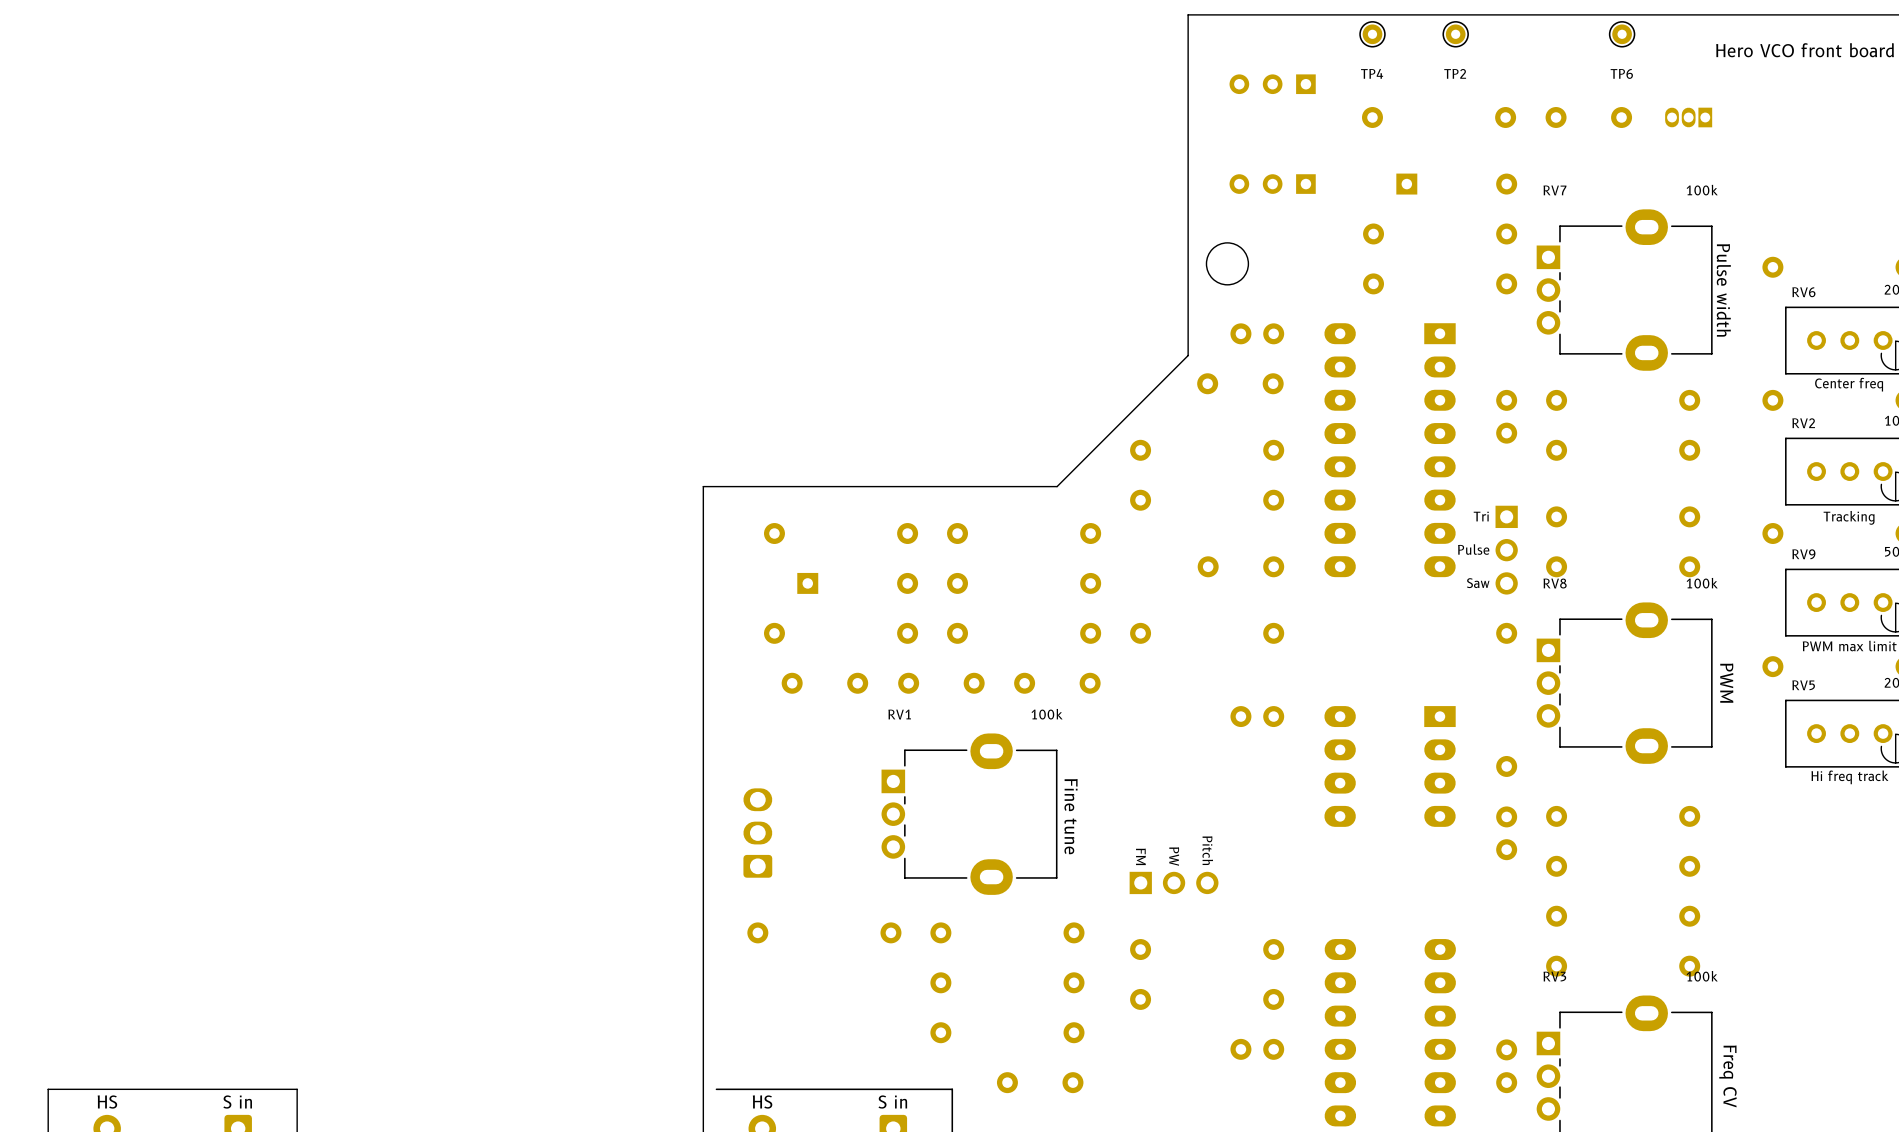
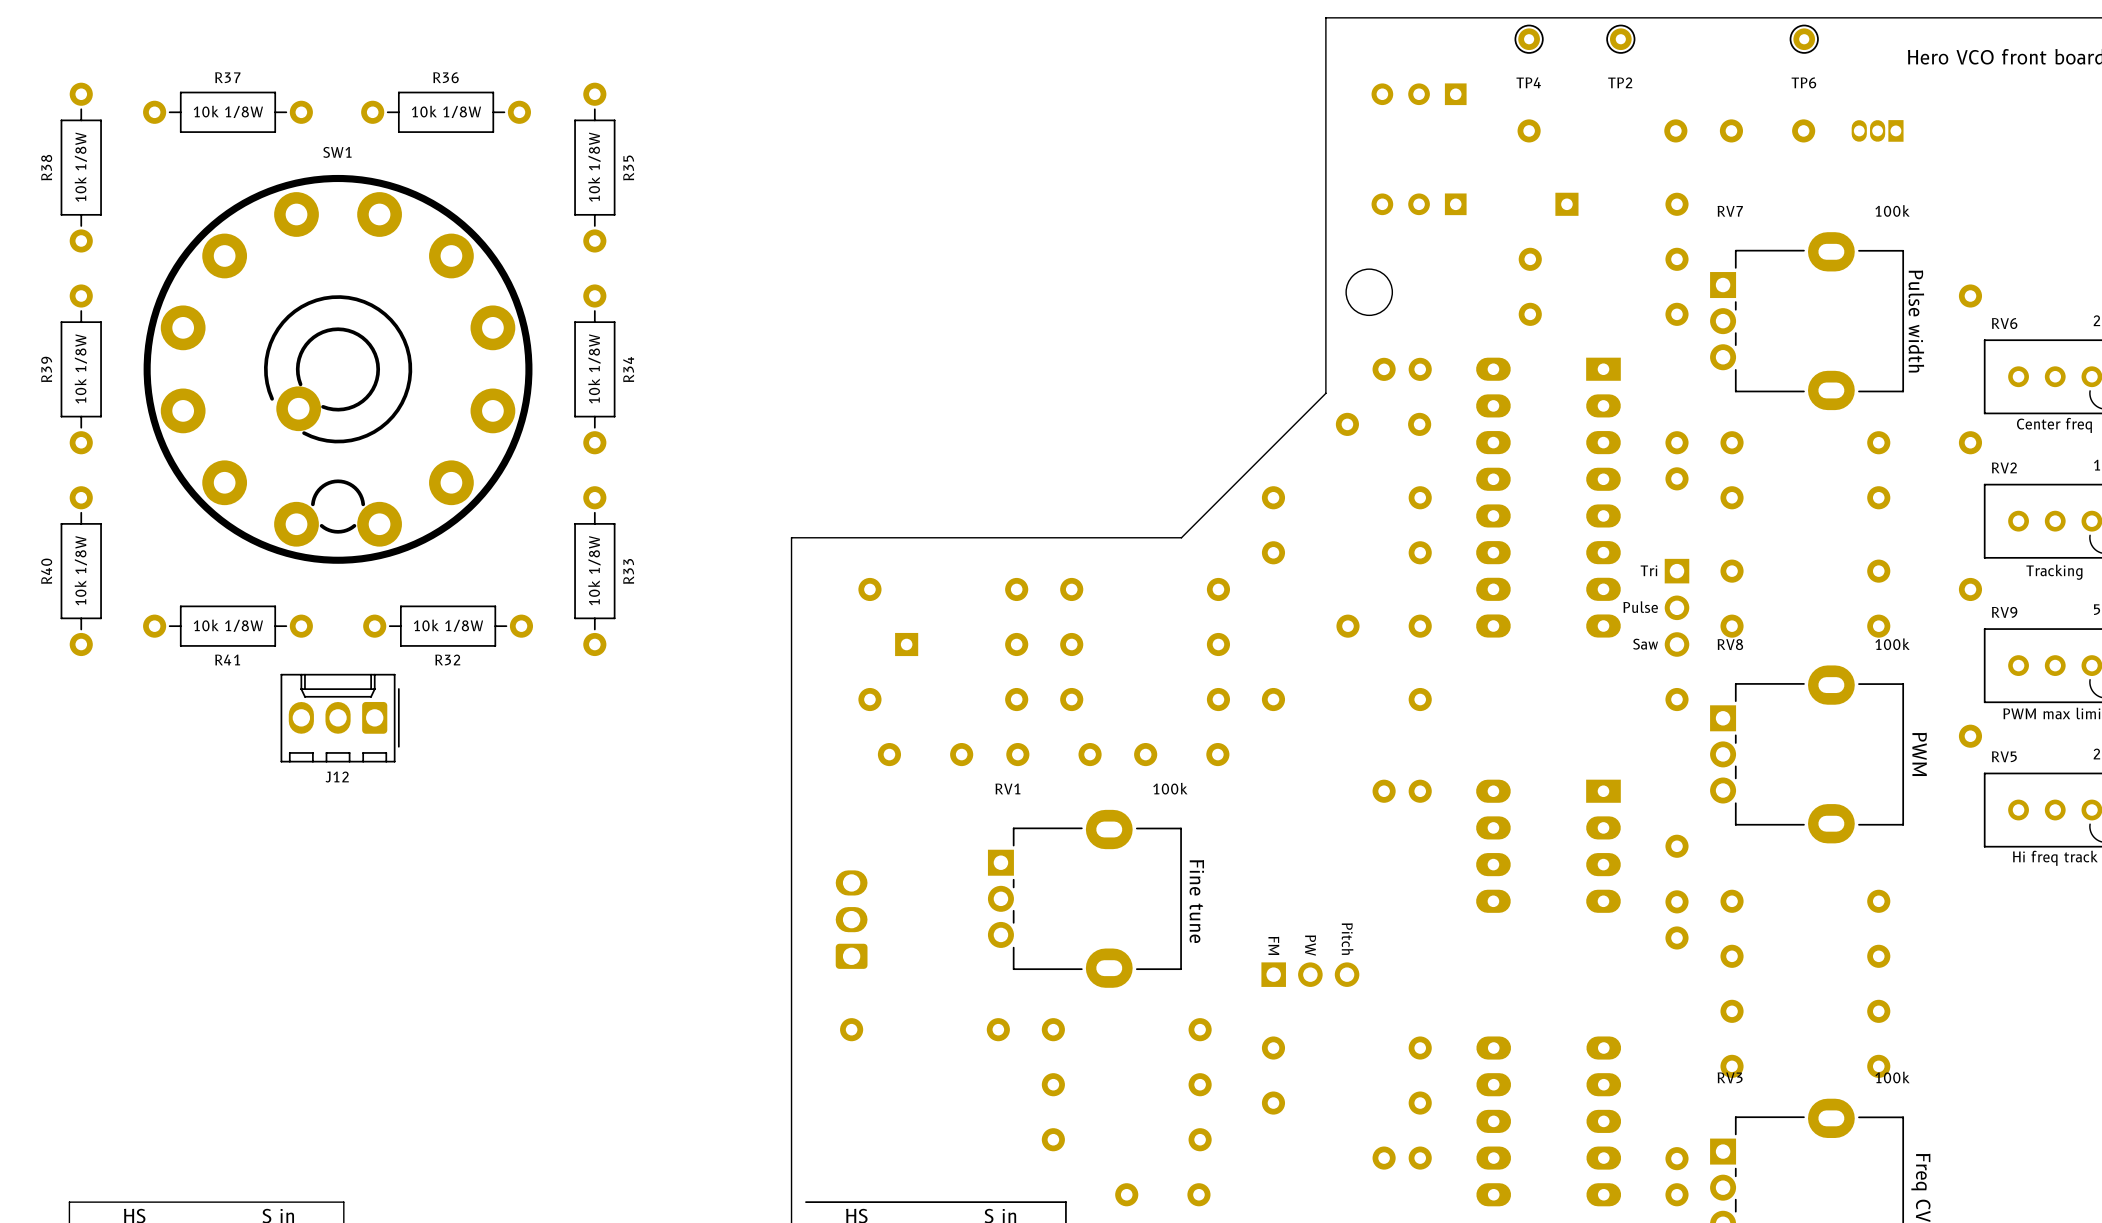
R37: none -> 10k 1/8W (227, 112)
R36: none -> 10k 1/8W (446, 112)
R38: none -> 10k 1/8W (81, 167)
R35: none -> 10k 1/8W (594, 167)
R39: none -> 10k 1/8W (81, 369)
SW1: none -> (338, 369)
R34: none -> 10k 1/8W (594, 369)
R40: none -> 10k 1/8W (81, 571)
R33: none -> 10k 1/8W (594, 571)
R41: none -> 10k 1/8W (227, 626)
R32: none -> 10k 1/8W (448, 626)
J12: none -> (340, 718)

